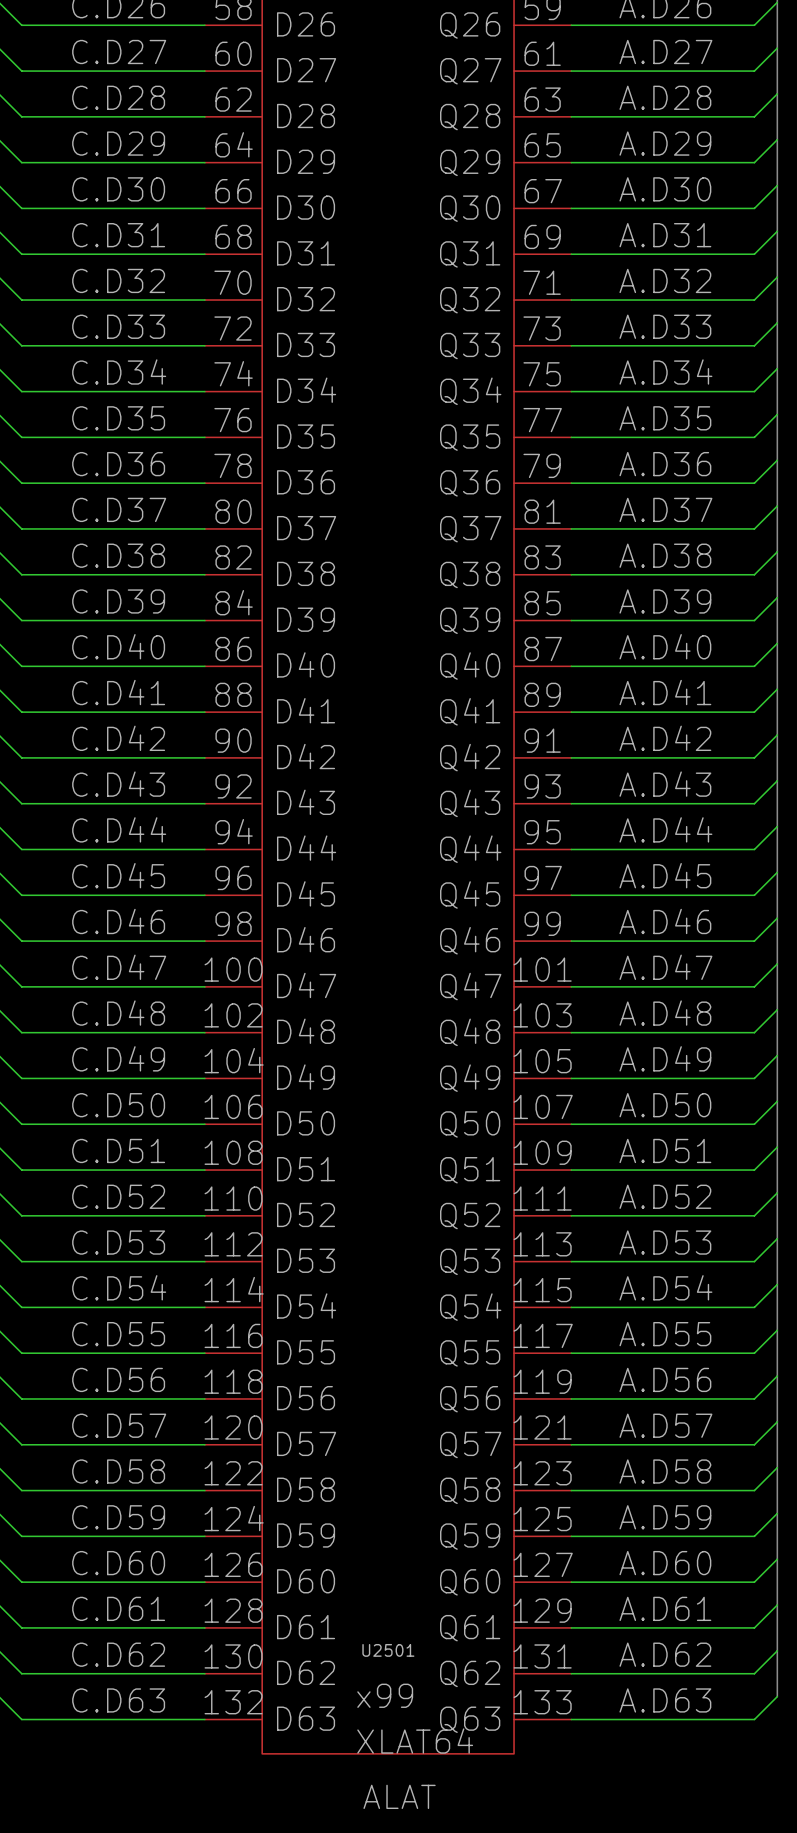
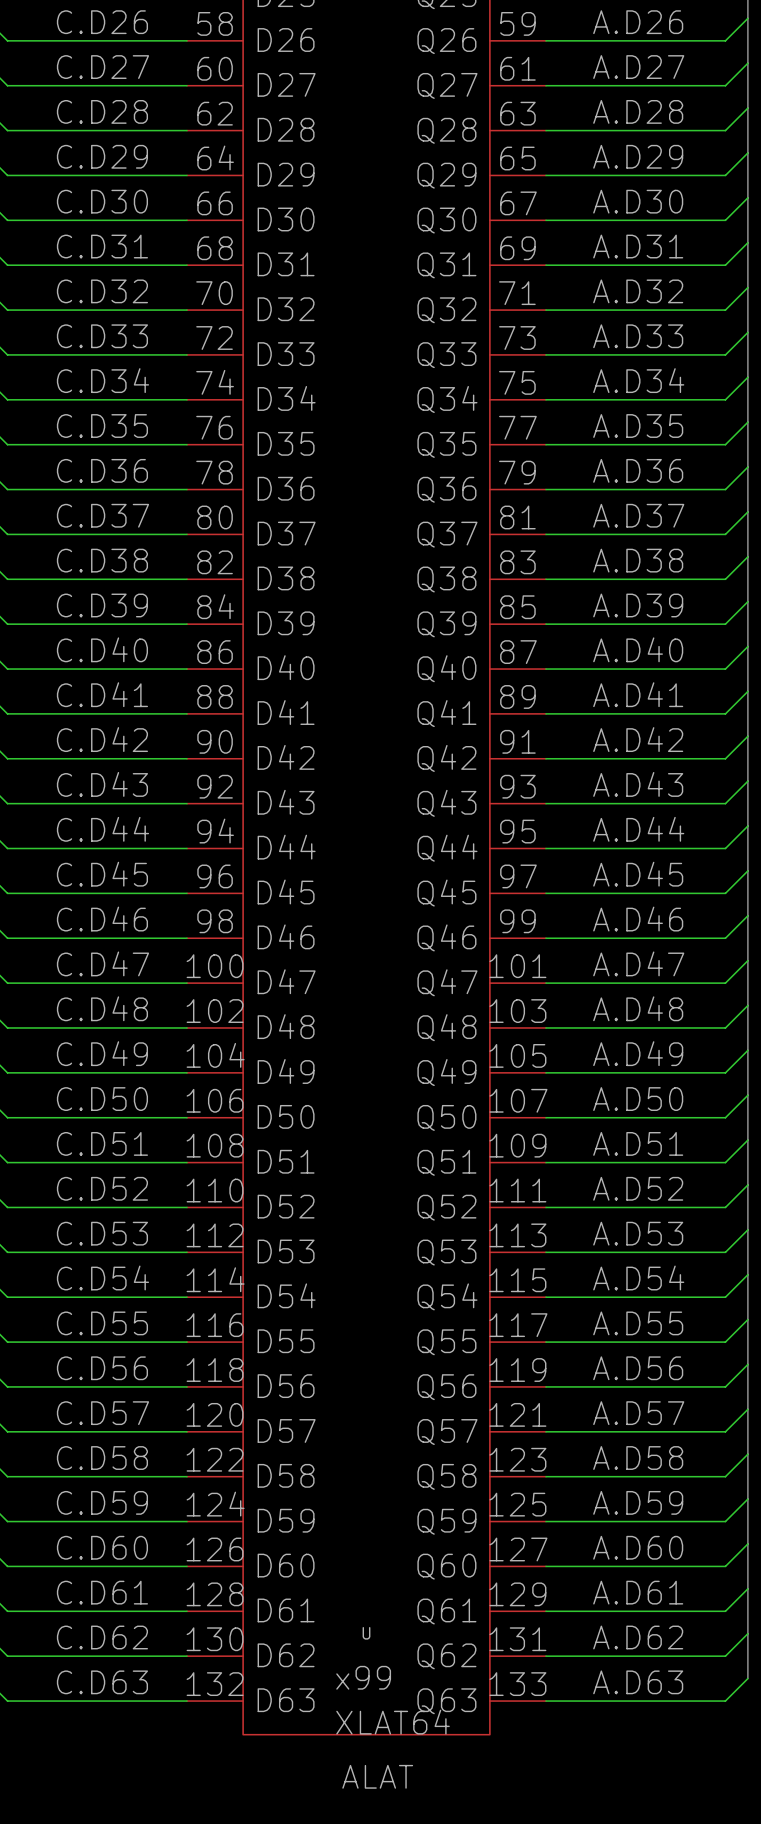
U2501 name: U2501 (388, 1650) -> U (366, 1633)

